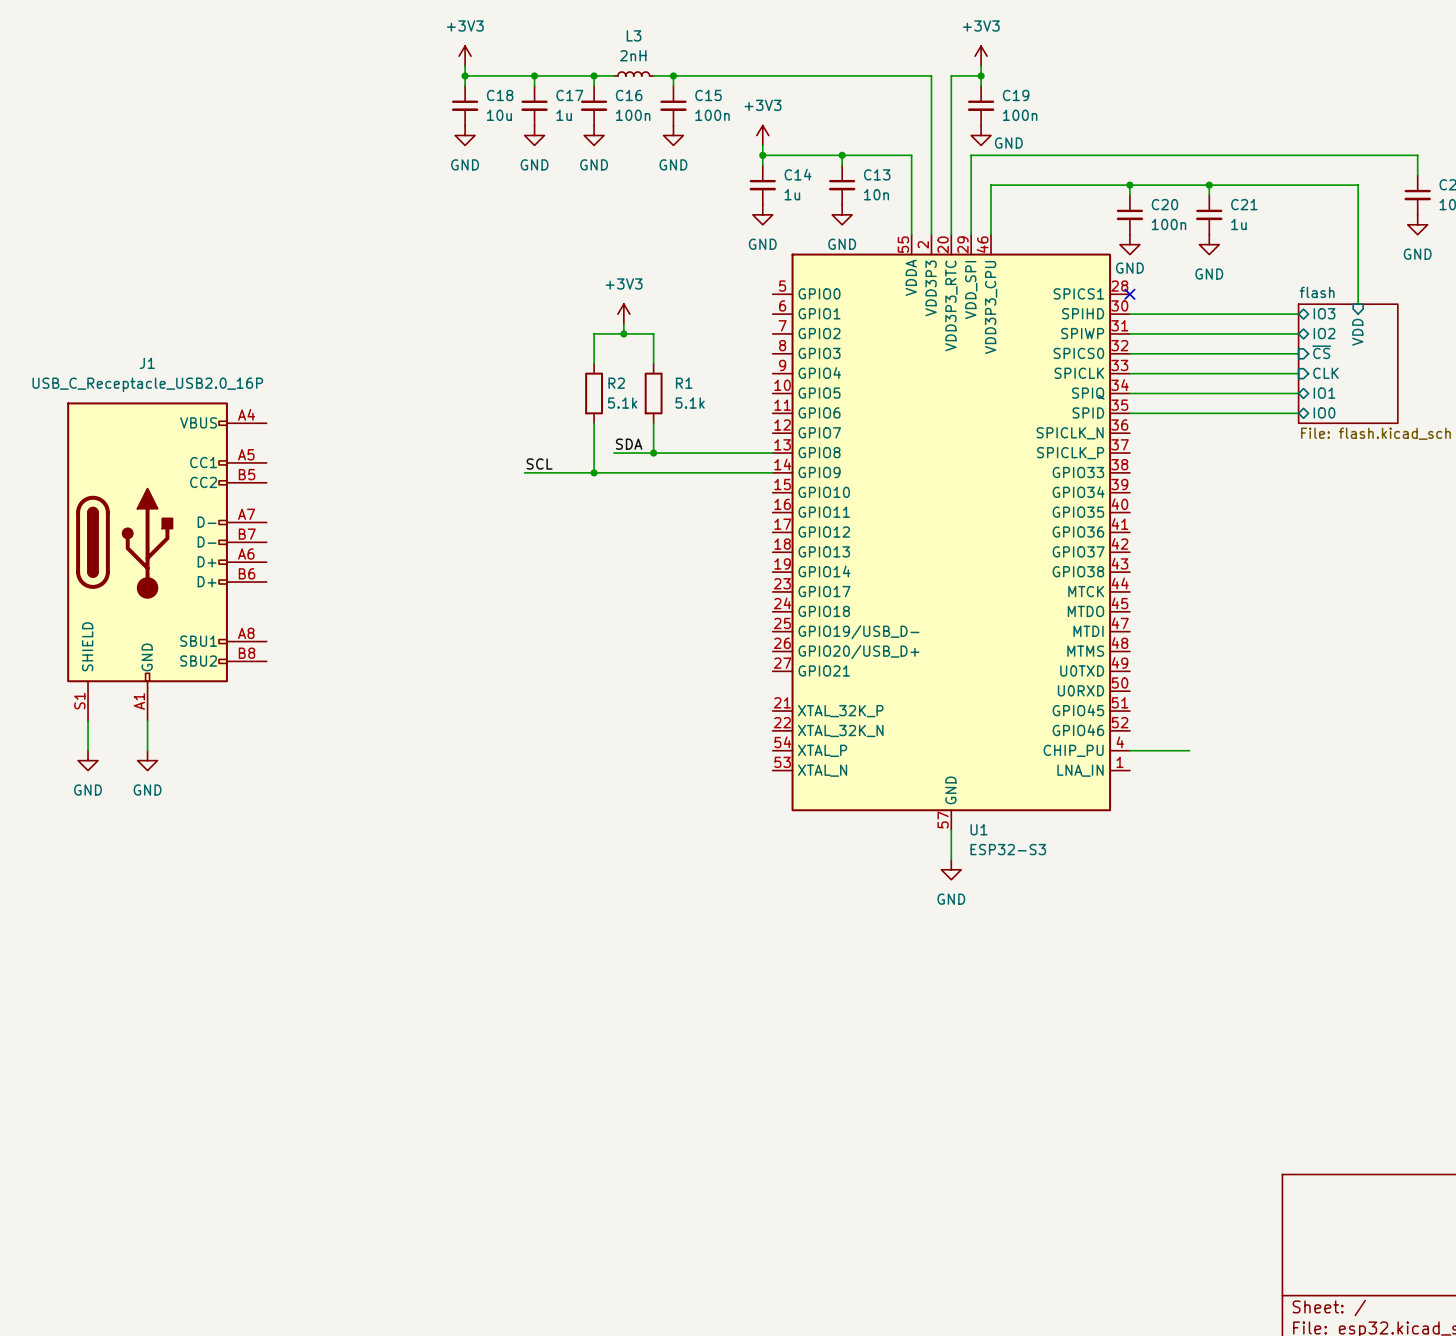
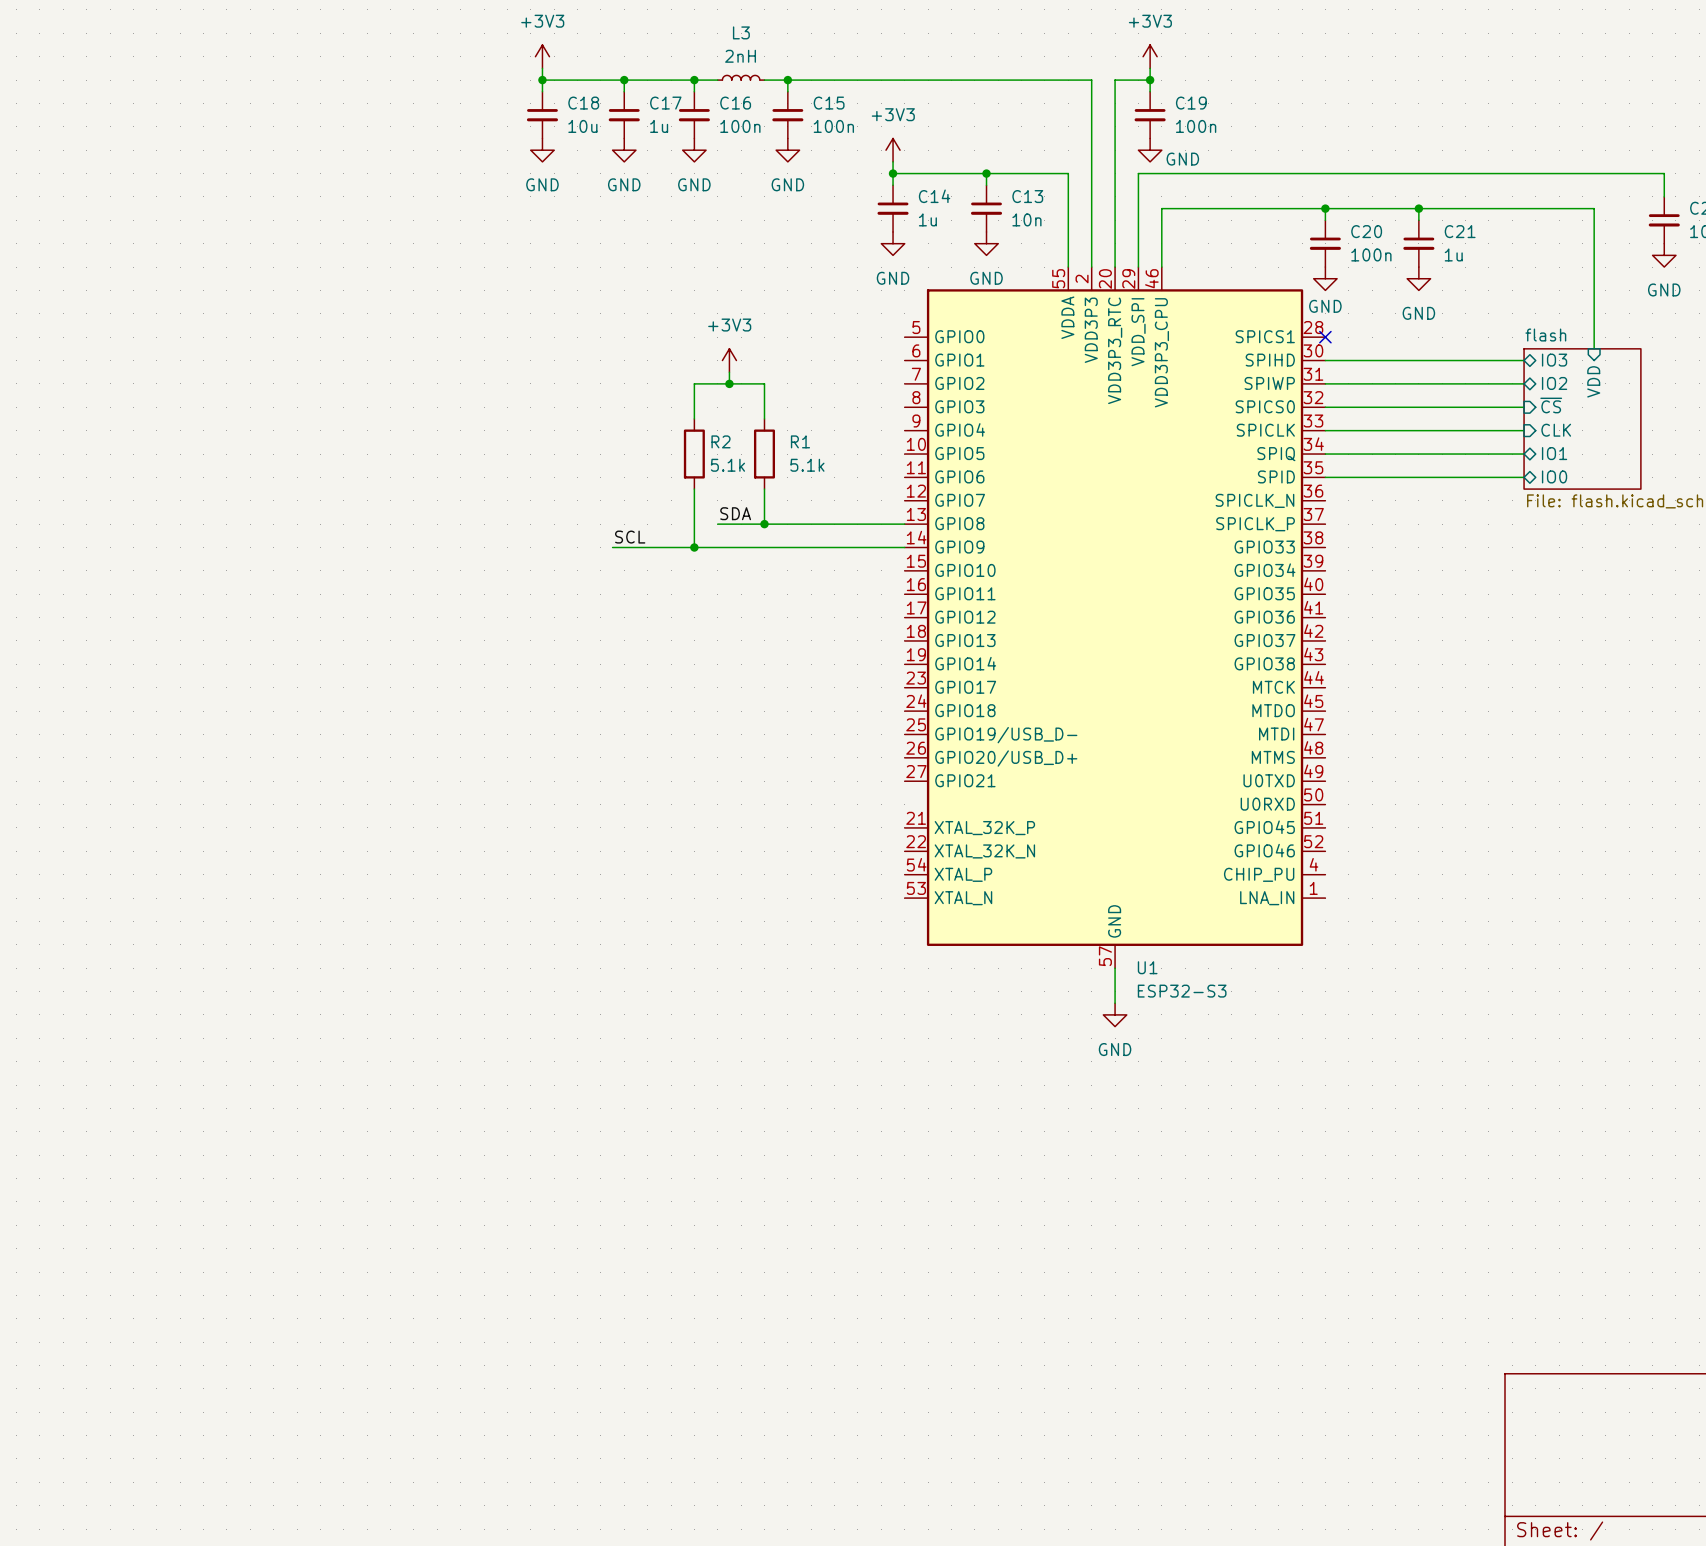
J1: USB_C_Receptacle_USB2.0_16P (166, 561) -> none
wire: (88, 720) (88, 750) -> none
wire: (147, 720) (147, 750) -> none
wire: (1129, 750) (1189, 750) -> none
power symbol: GND (88, 760) -> none
power symbol: GND (147, 760) -> none

